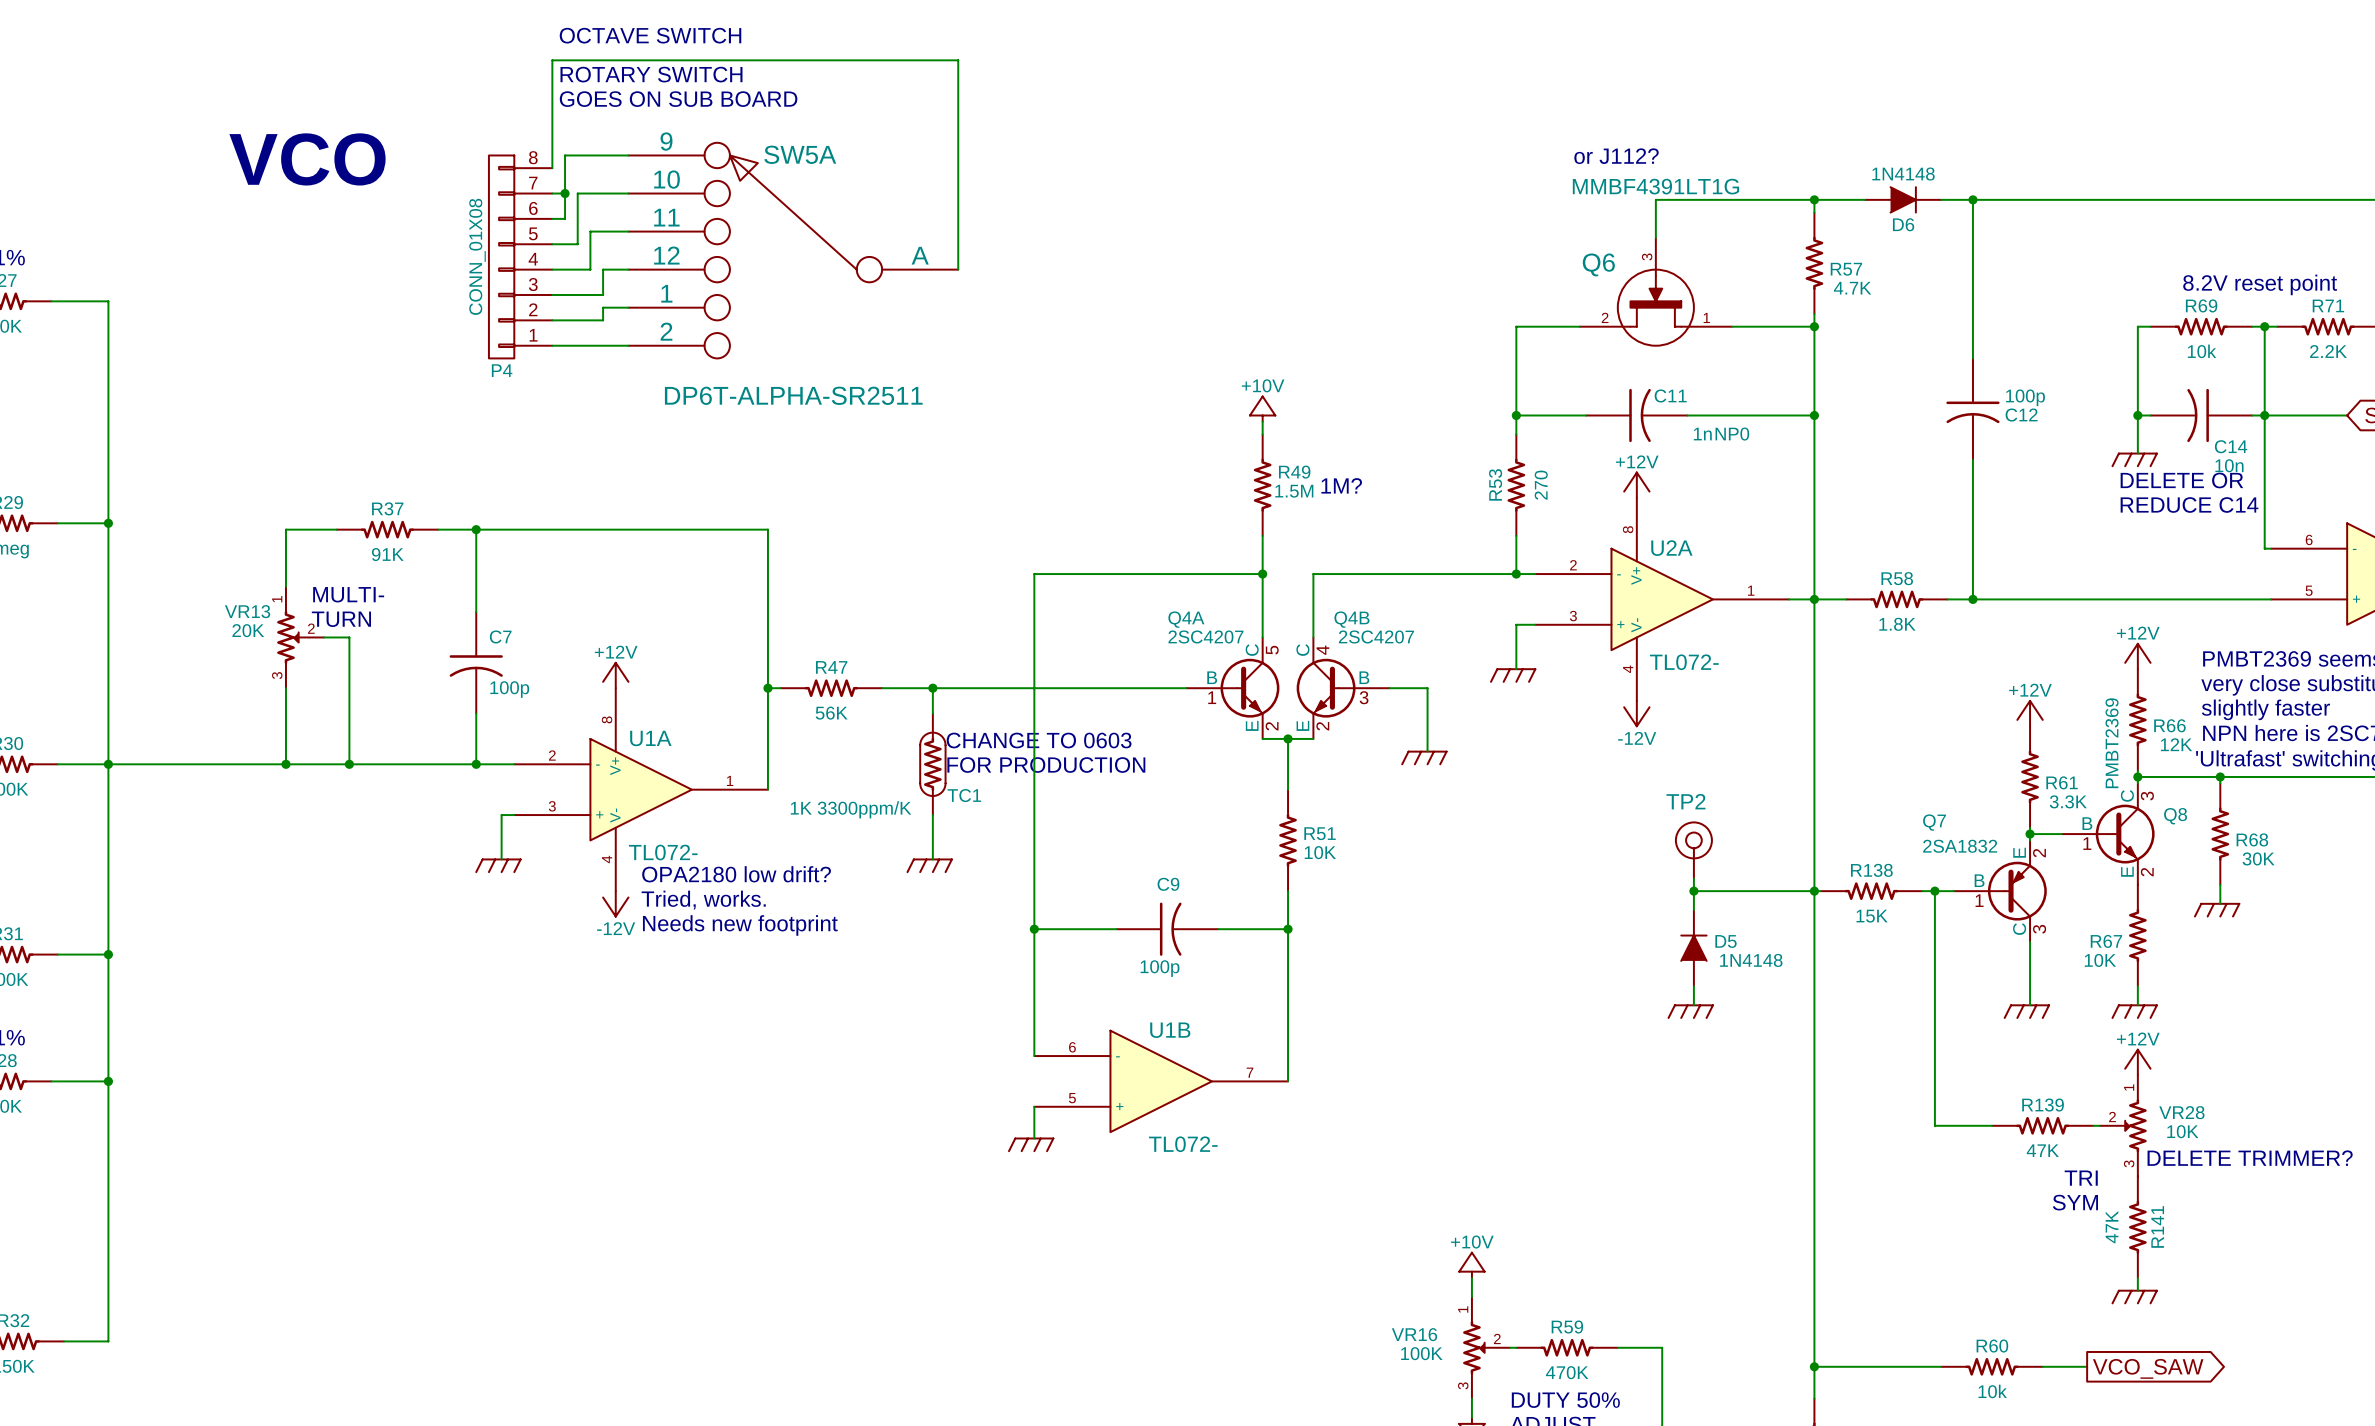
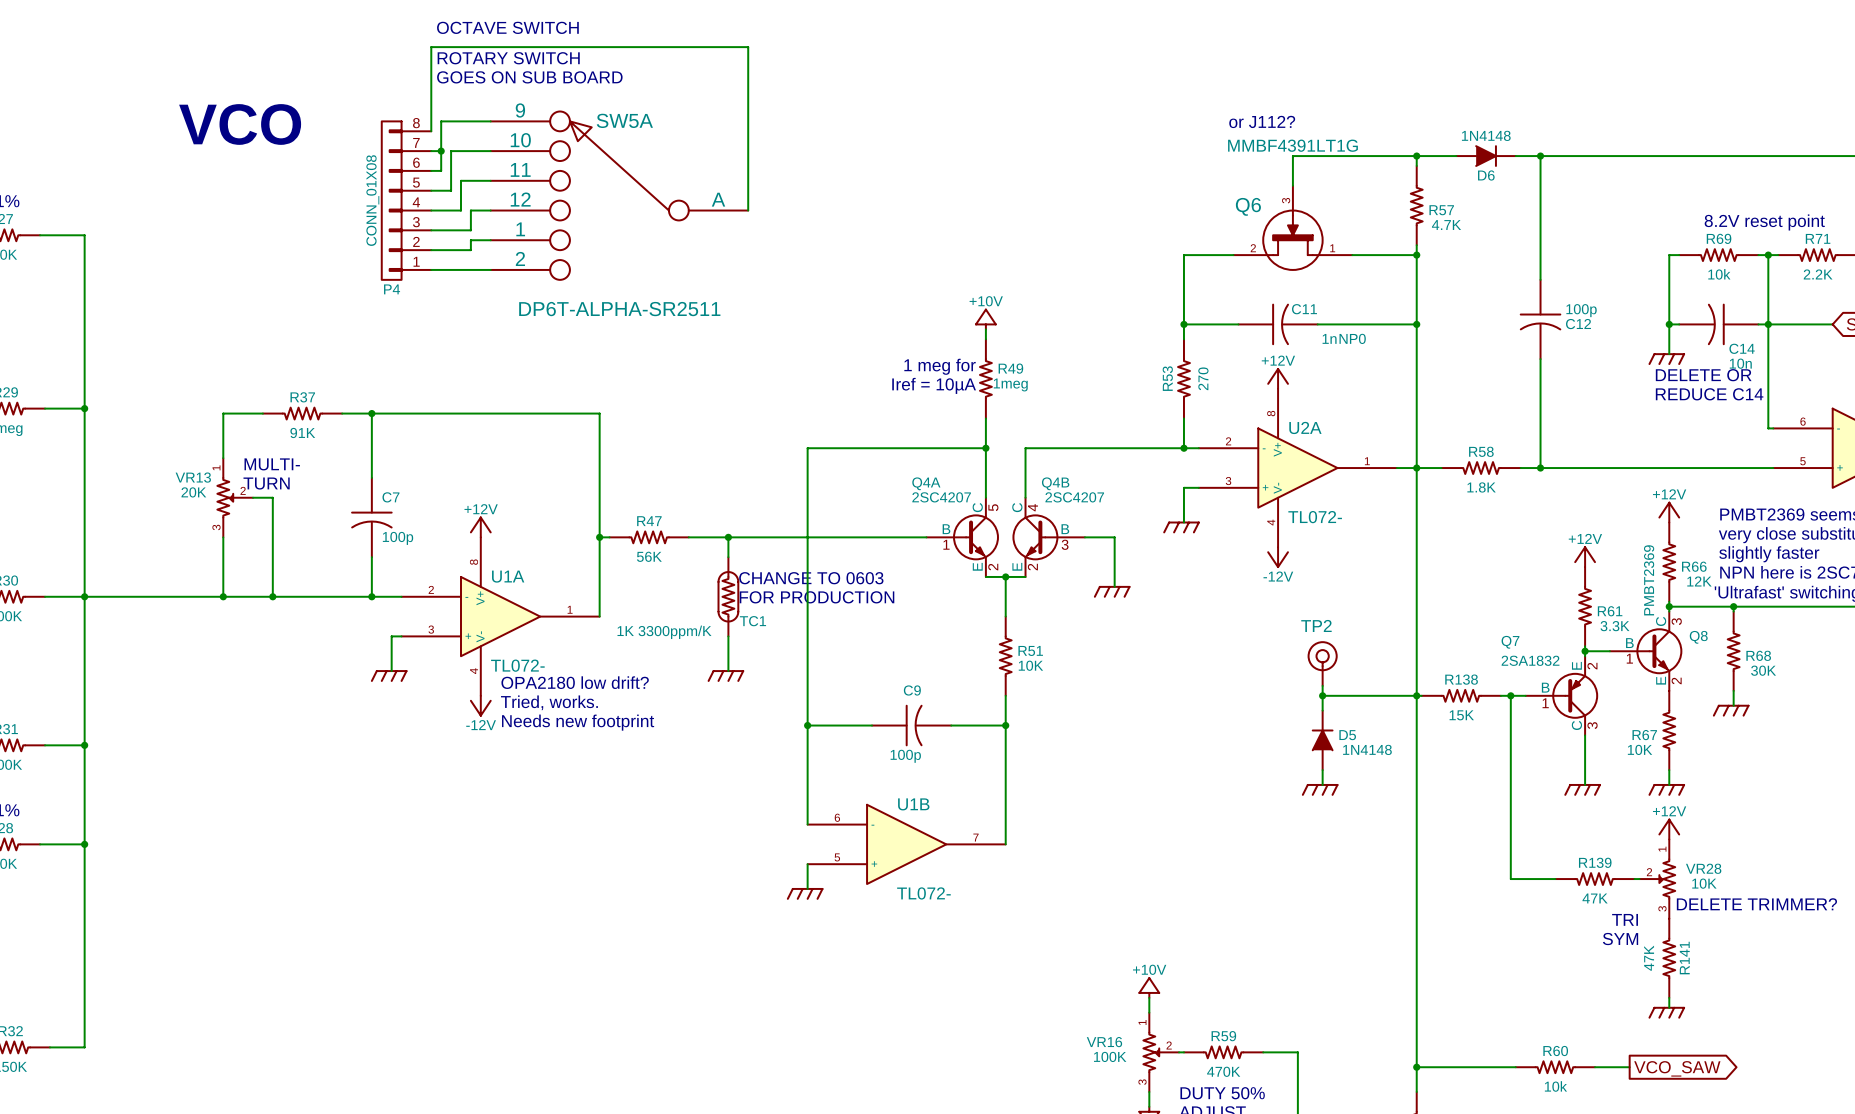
text: none -> 1 meg for (940, 366)
text: 1M? (1341, 485) -> none
R49 value: 1.5M (1294, 491) -> 1meg (1010, 384)
text: none -> Iref = 10µA (934, 385)

